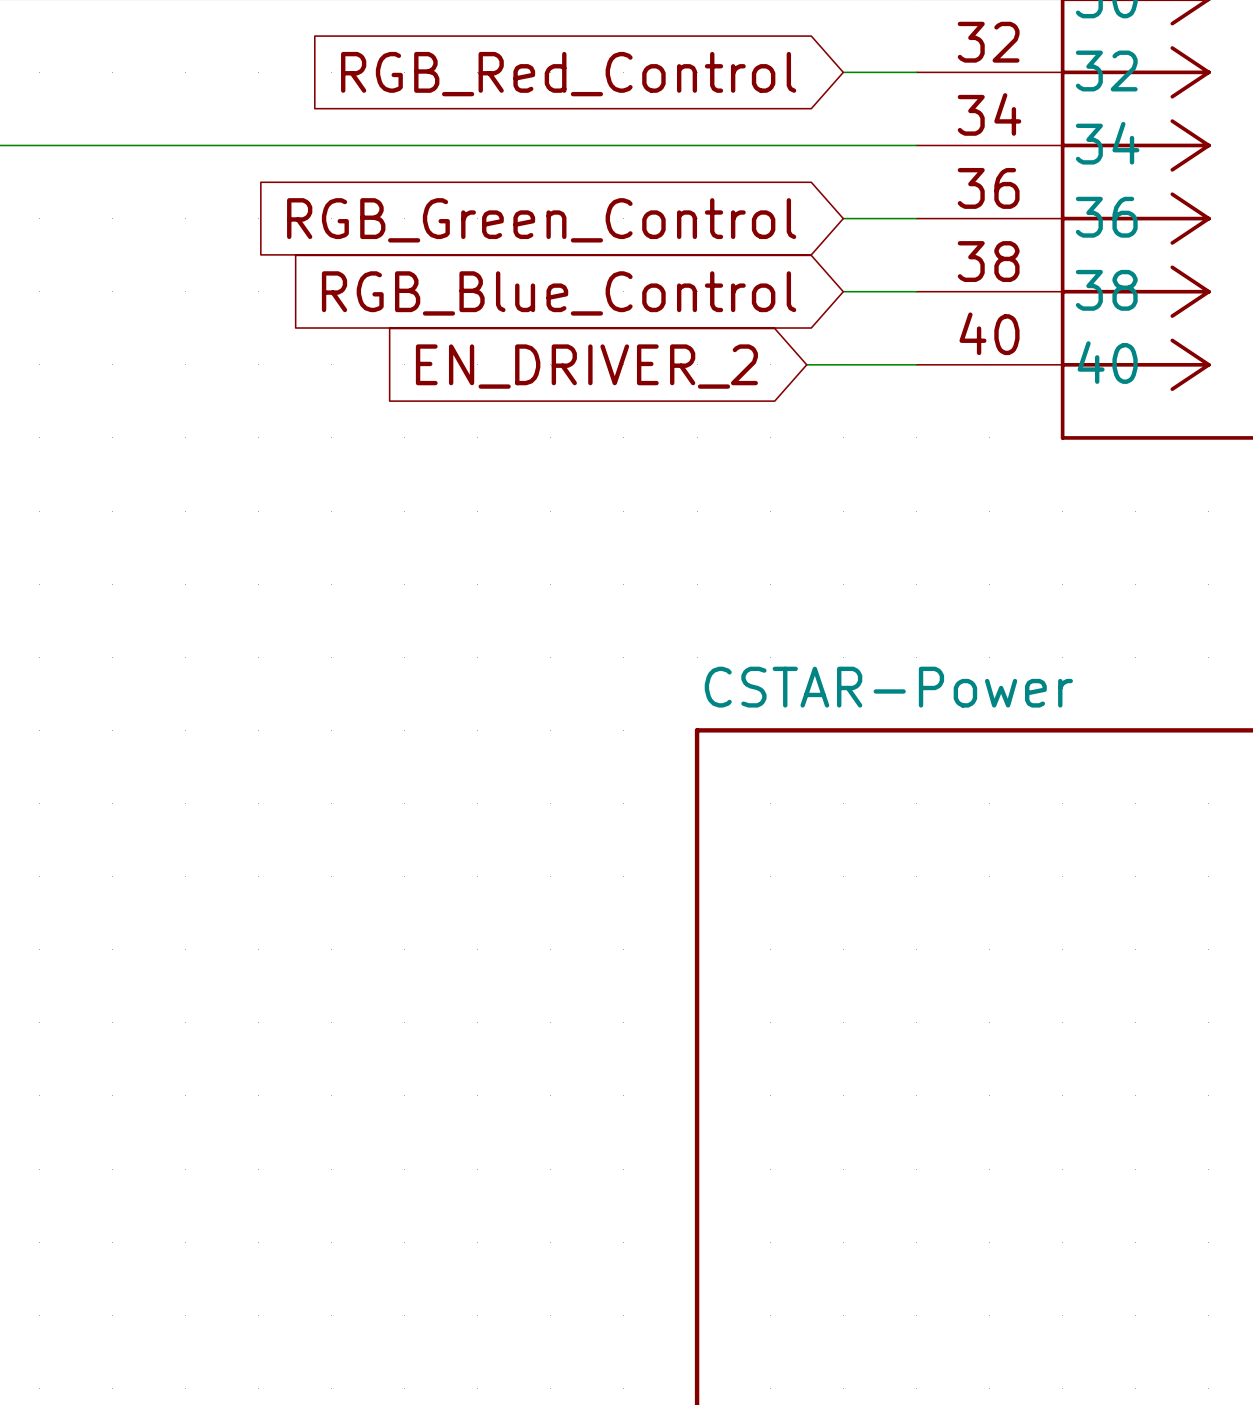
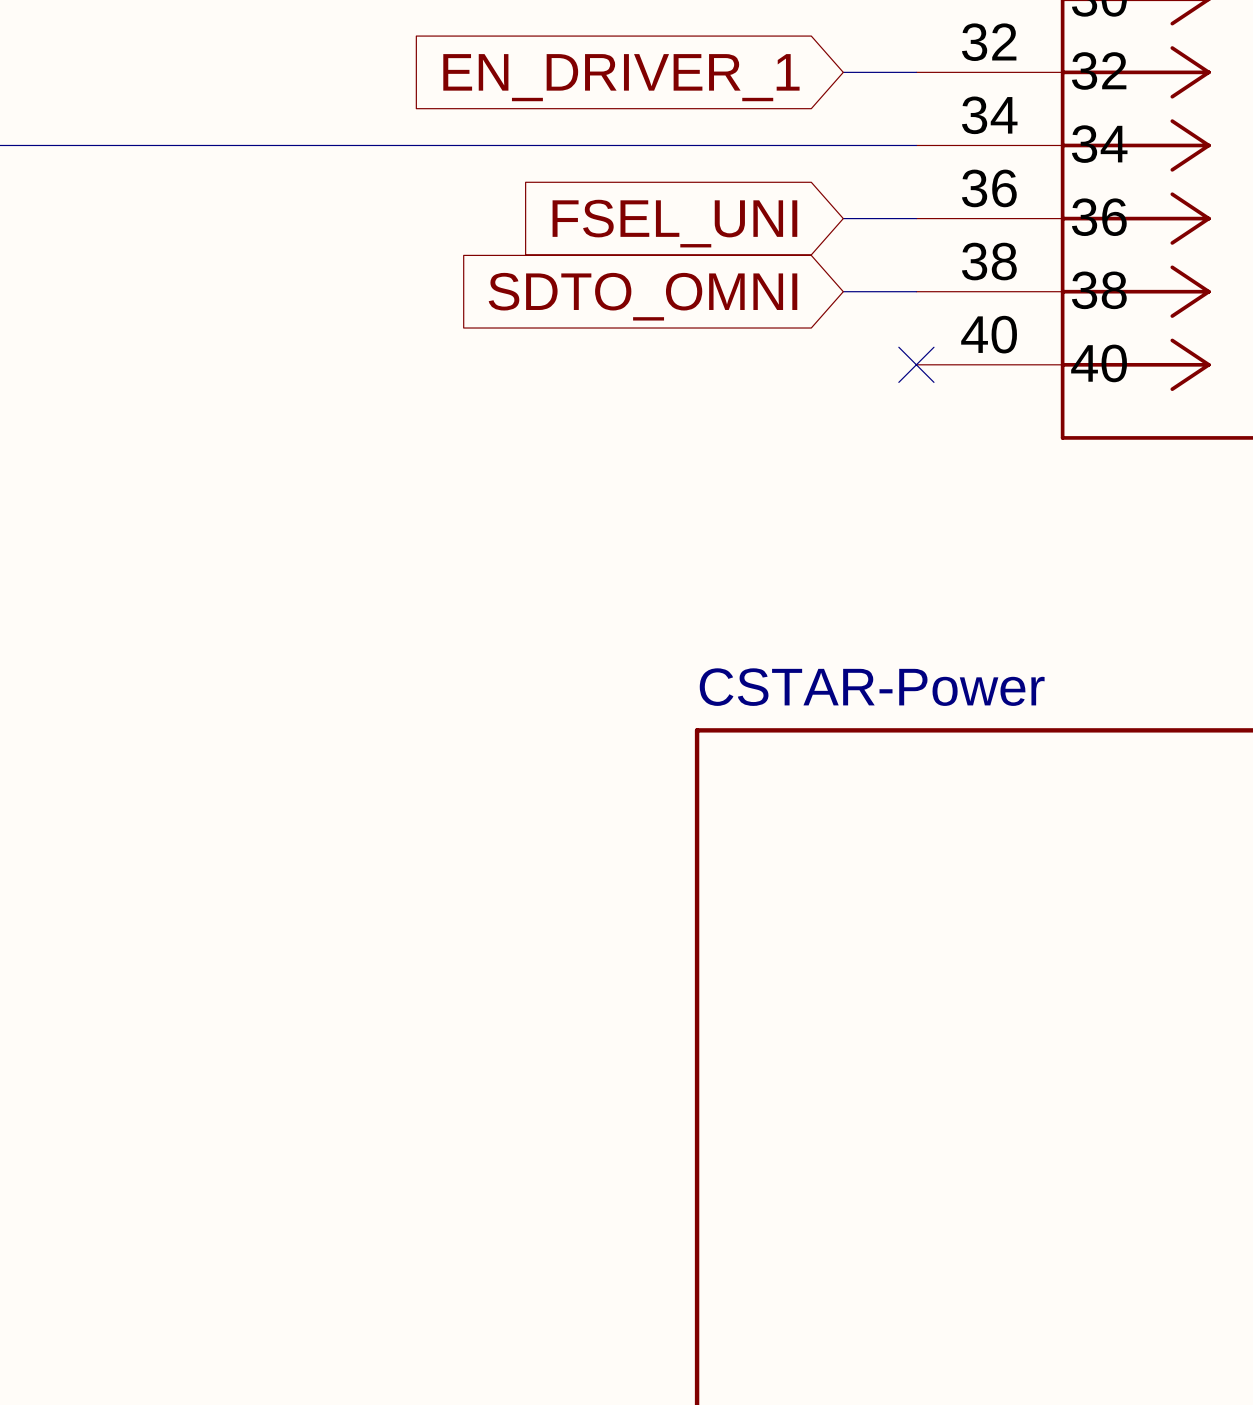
global label: RGB_Red_Control (568, 74) -> EN_DRIVER_1 (621, 77)
global label: RGB_Green_Control (541, 220) -> FSEL_UNI (674, 223)
global label: RGB_Blue_Control (559, 293) -> SDTO_OMNI (642, 296)
wire: (806, 364) (916, 364) -> none
no-connect mark: none -> (916, 364)
global label: EN_DRIVER_2 (586, 366) -> none

